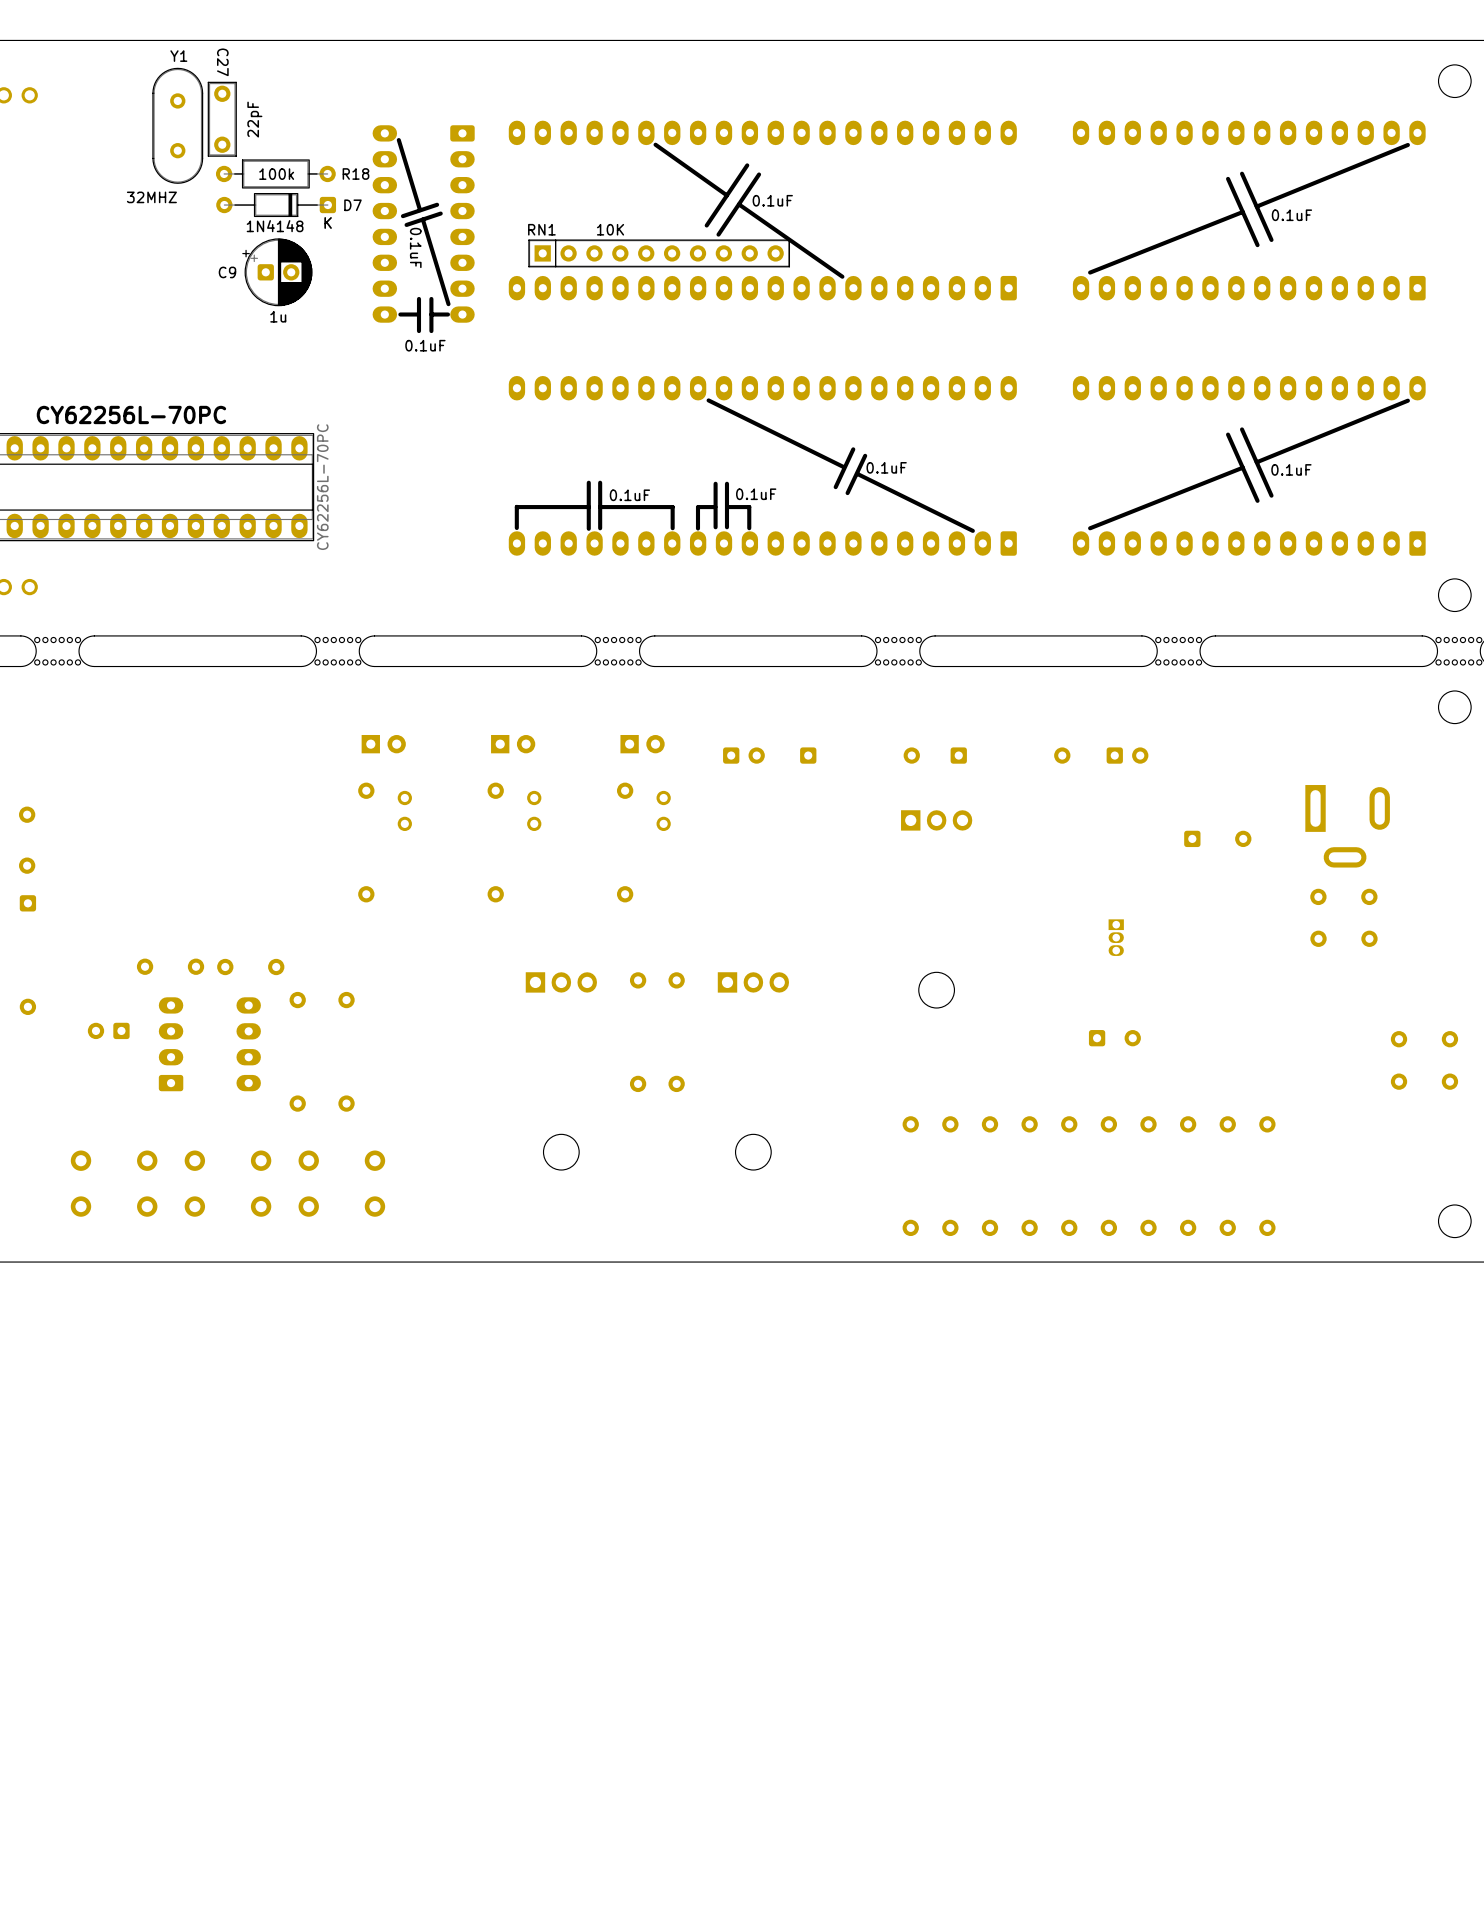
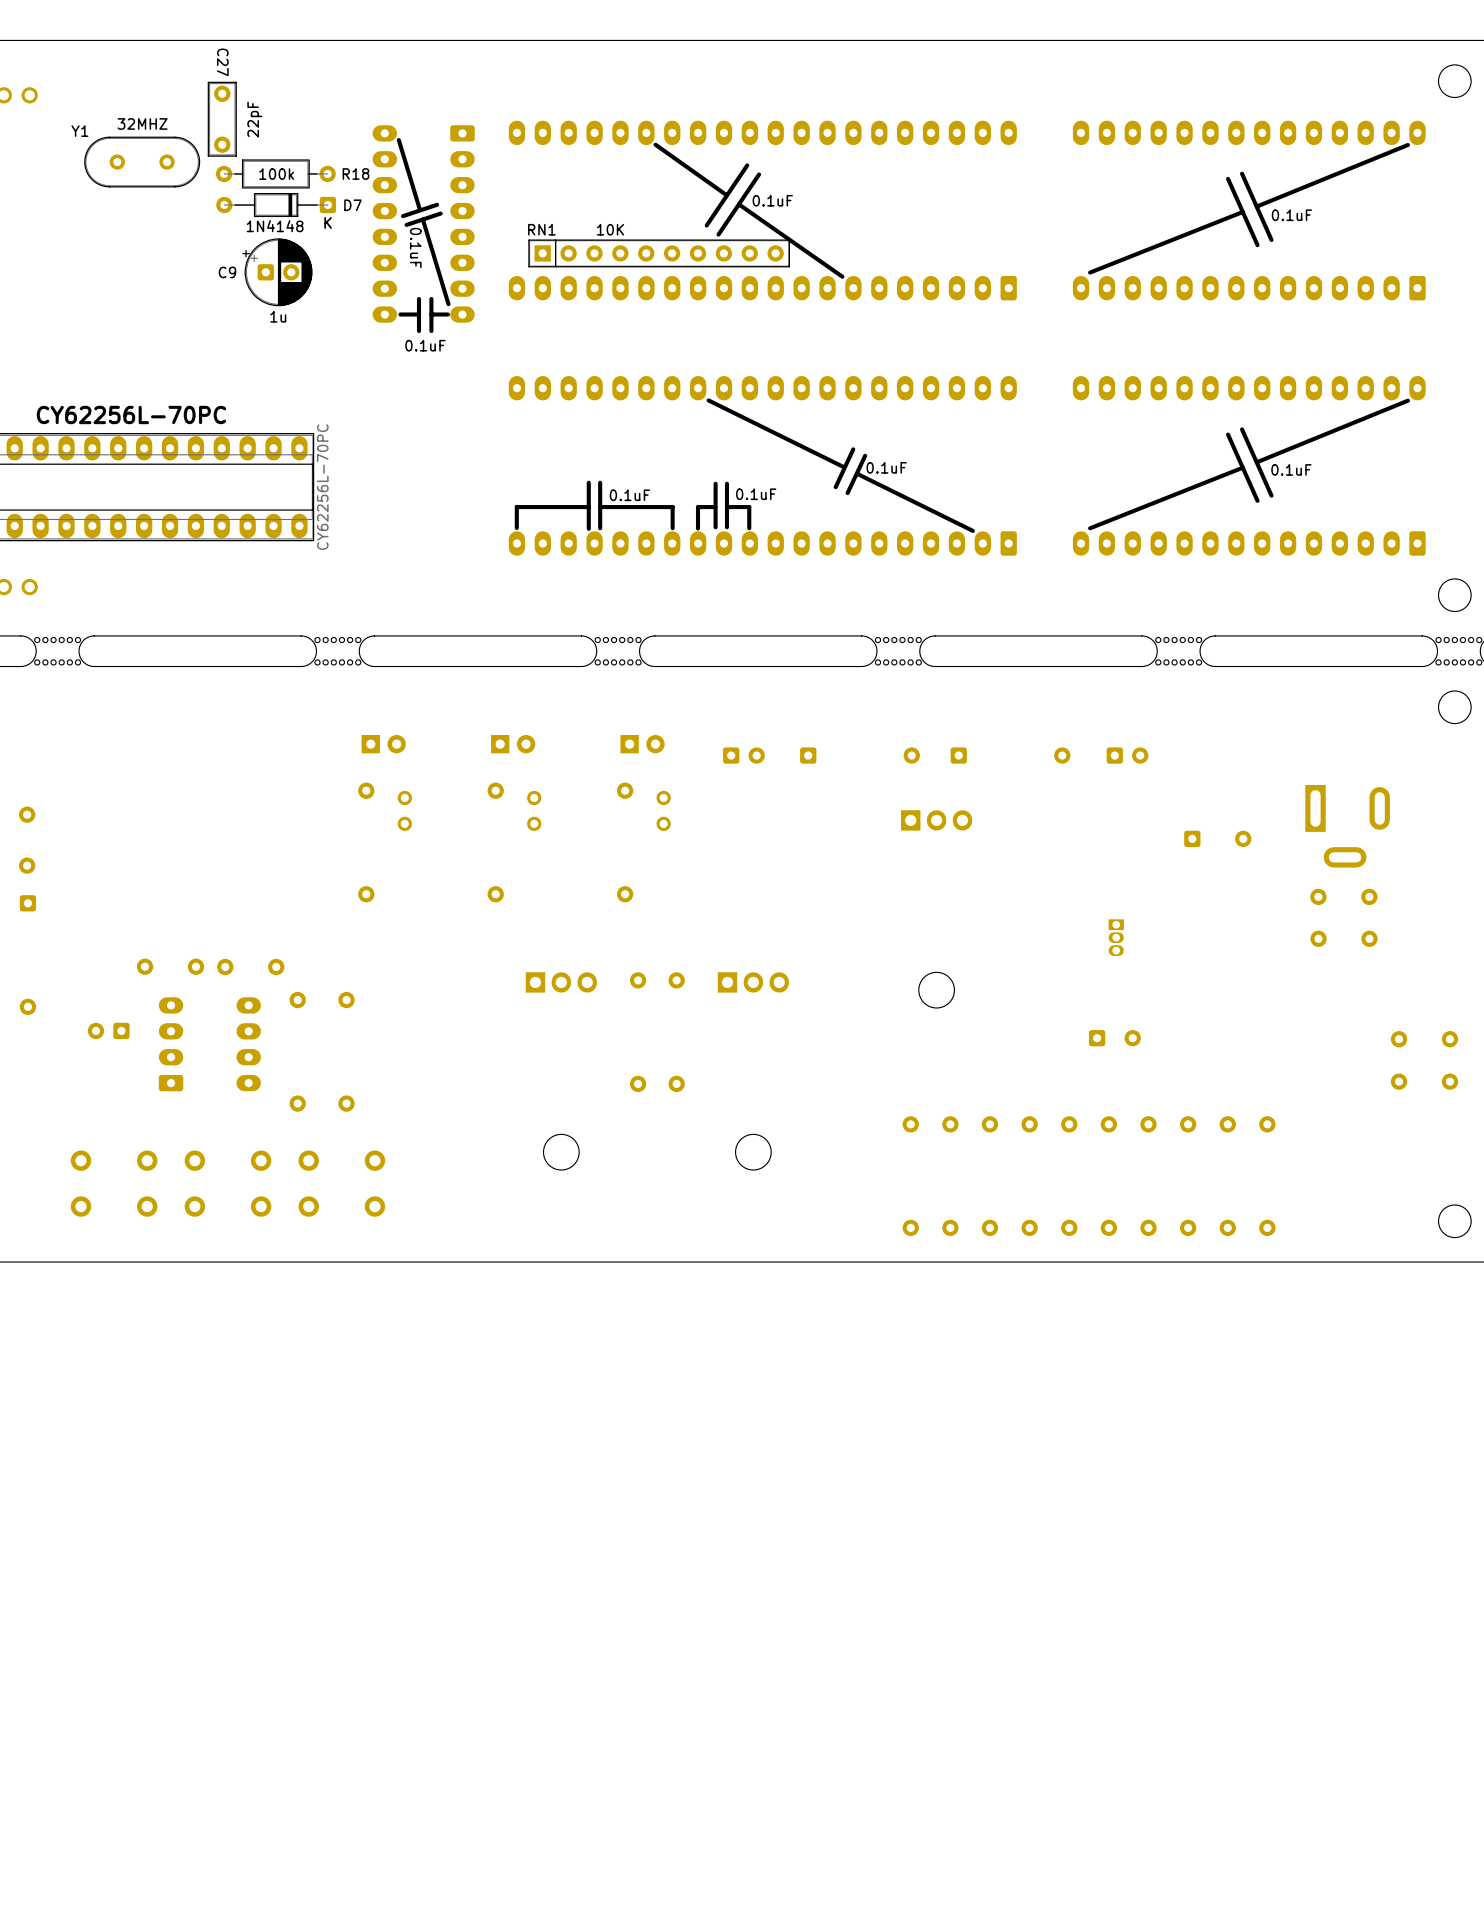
Y1 name position: Y1 (178, 56) -> Y1 (79, 131)
Y1 rotation: 0° (177, 125) -> 90° counterclockwise (142, 162)
Y1 value position: 32MHZ (151, 197) -> 32MHZ (142, 123)

